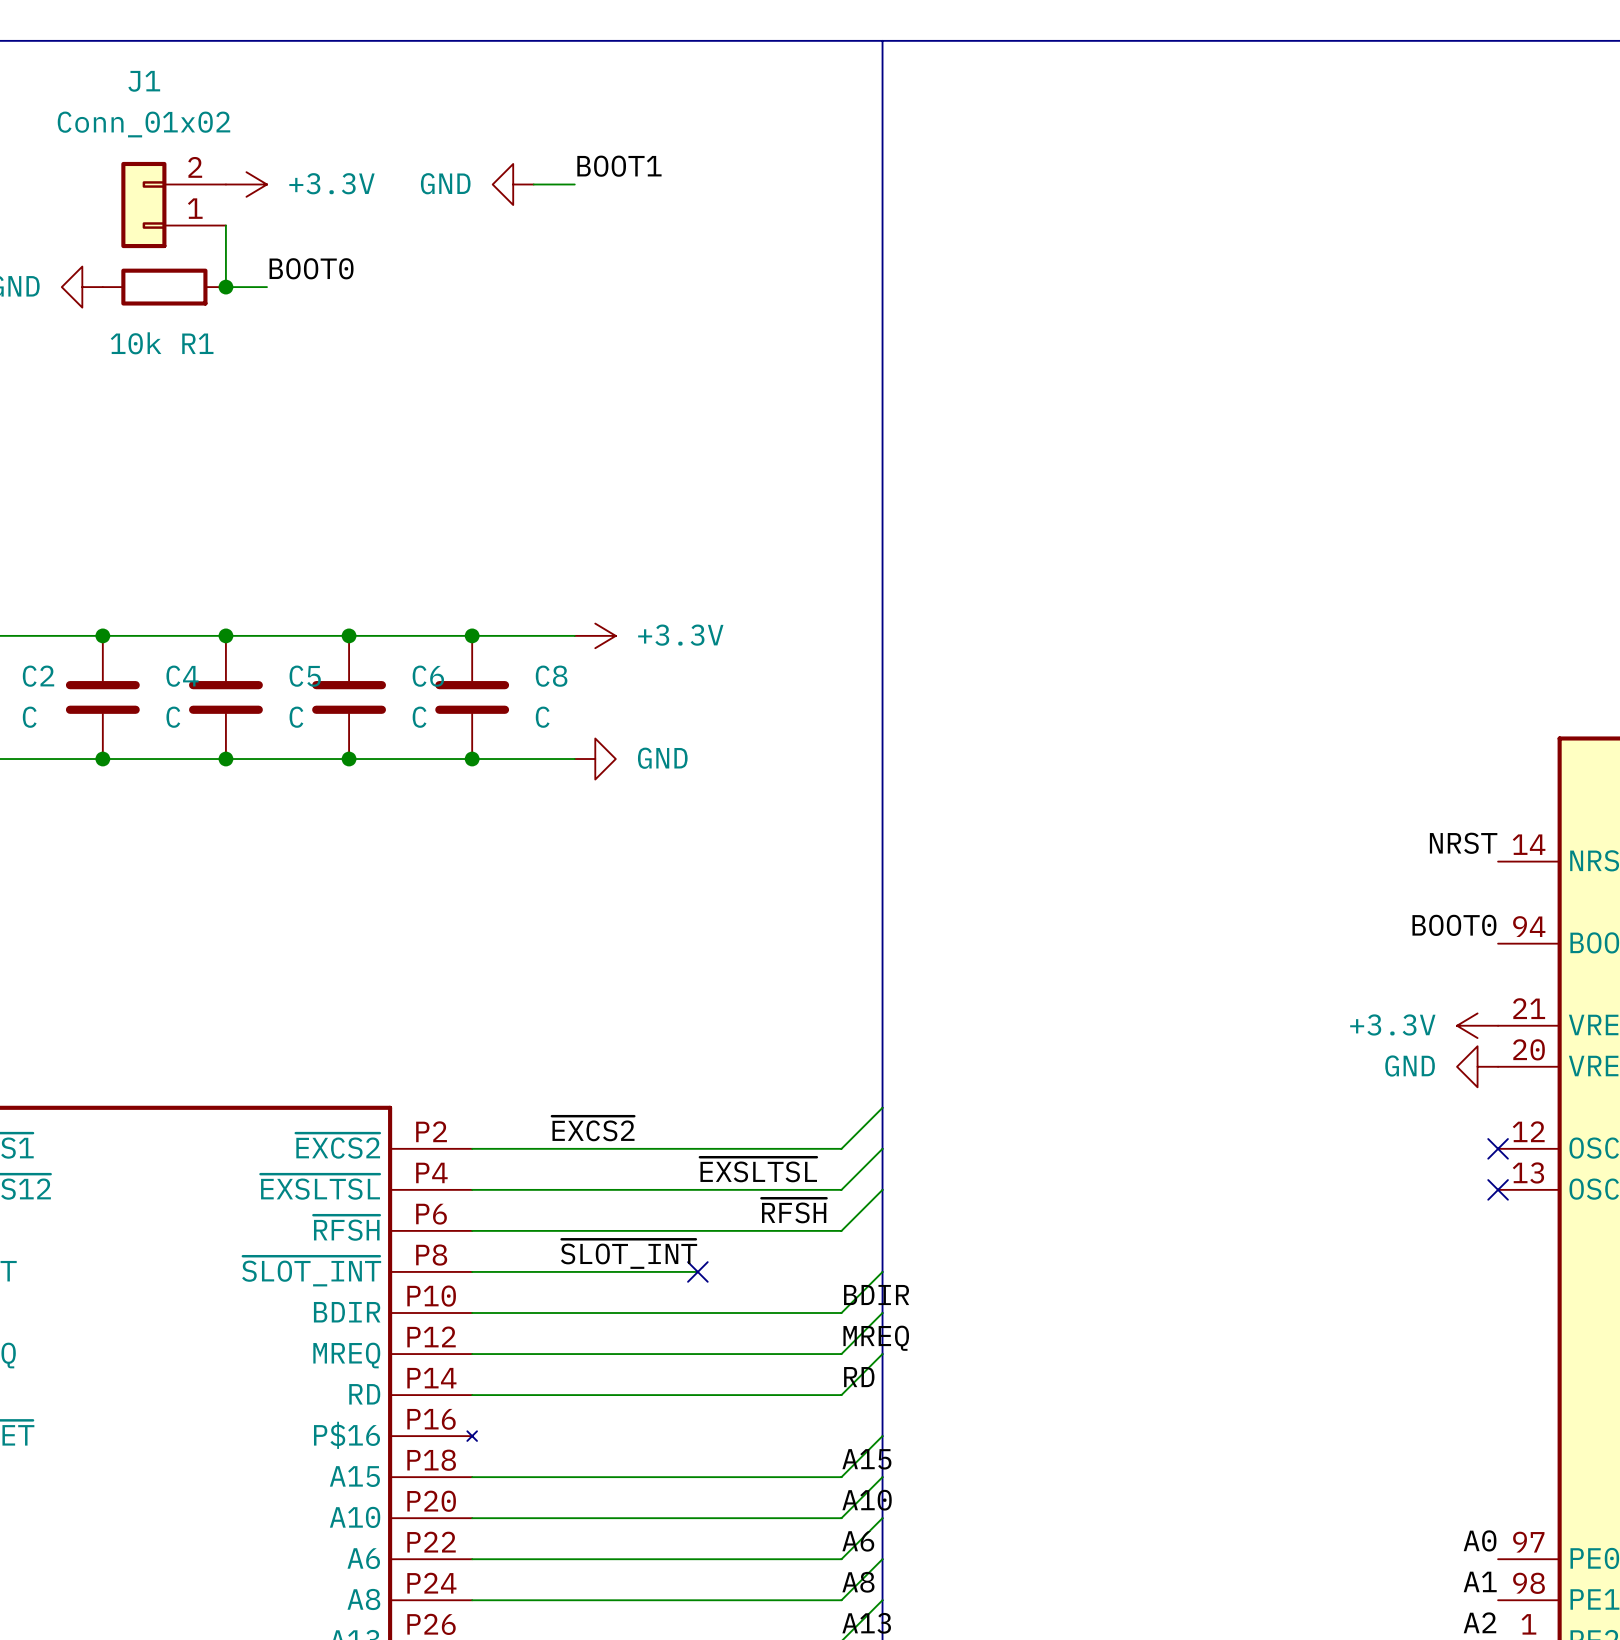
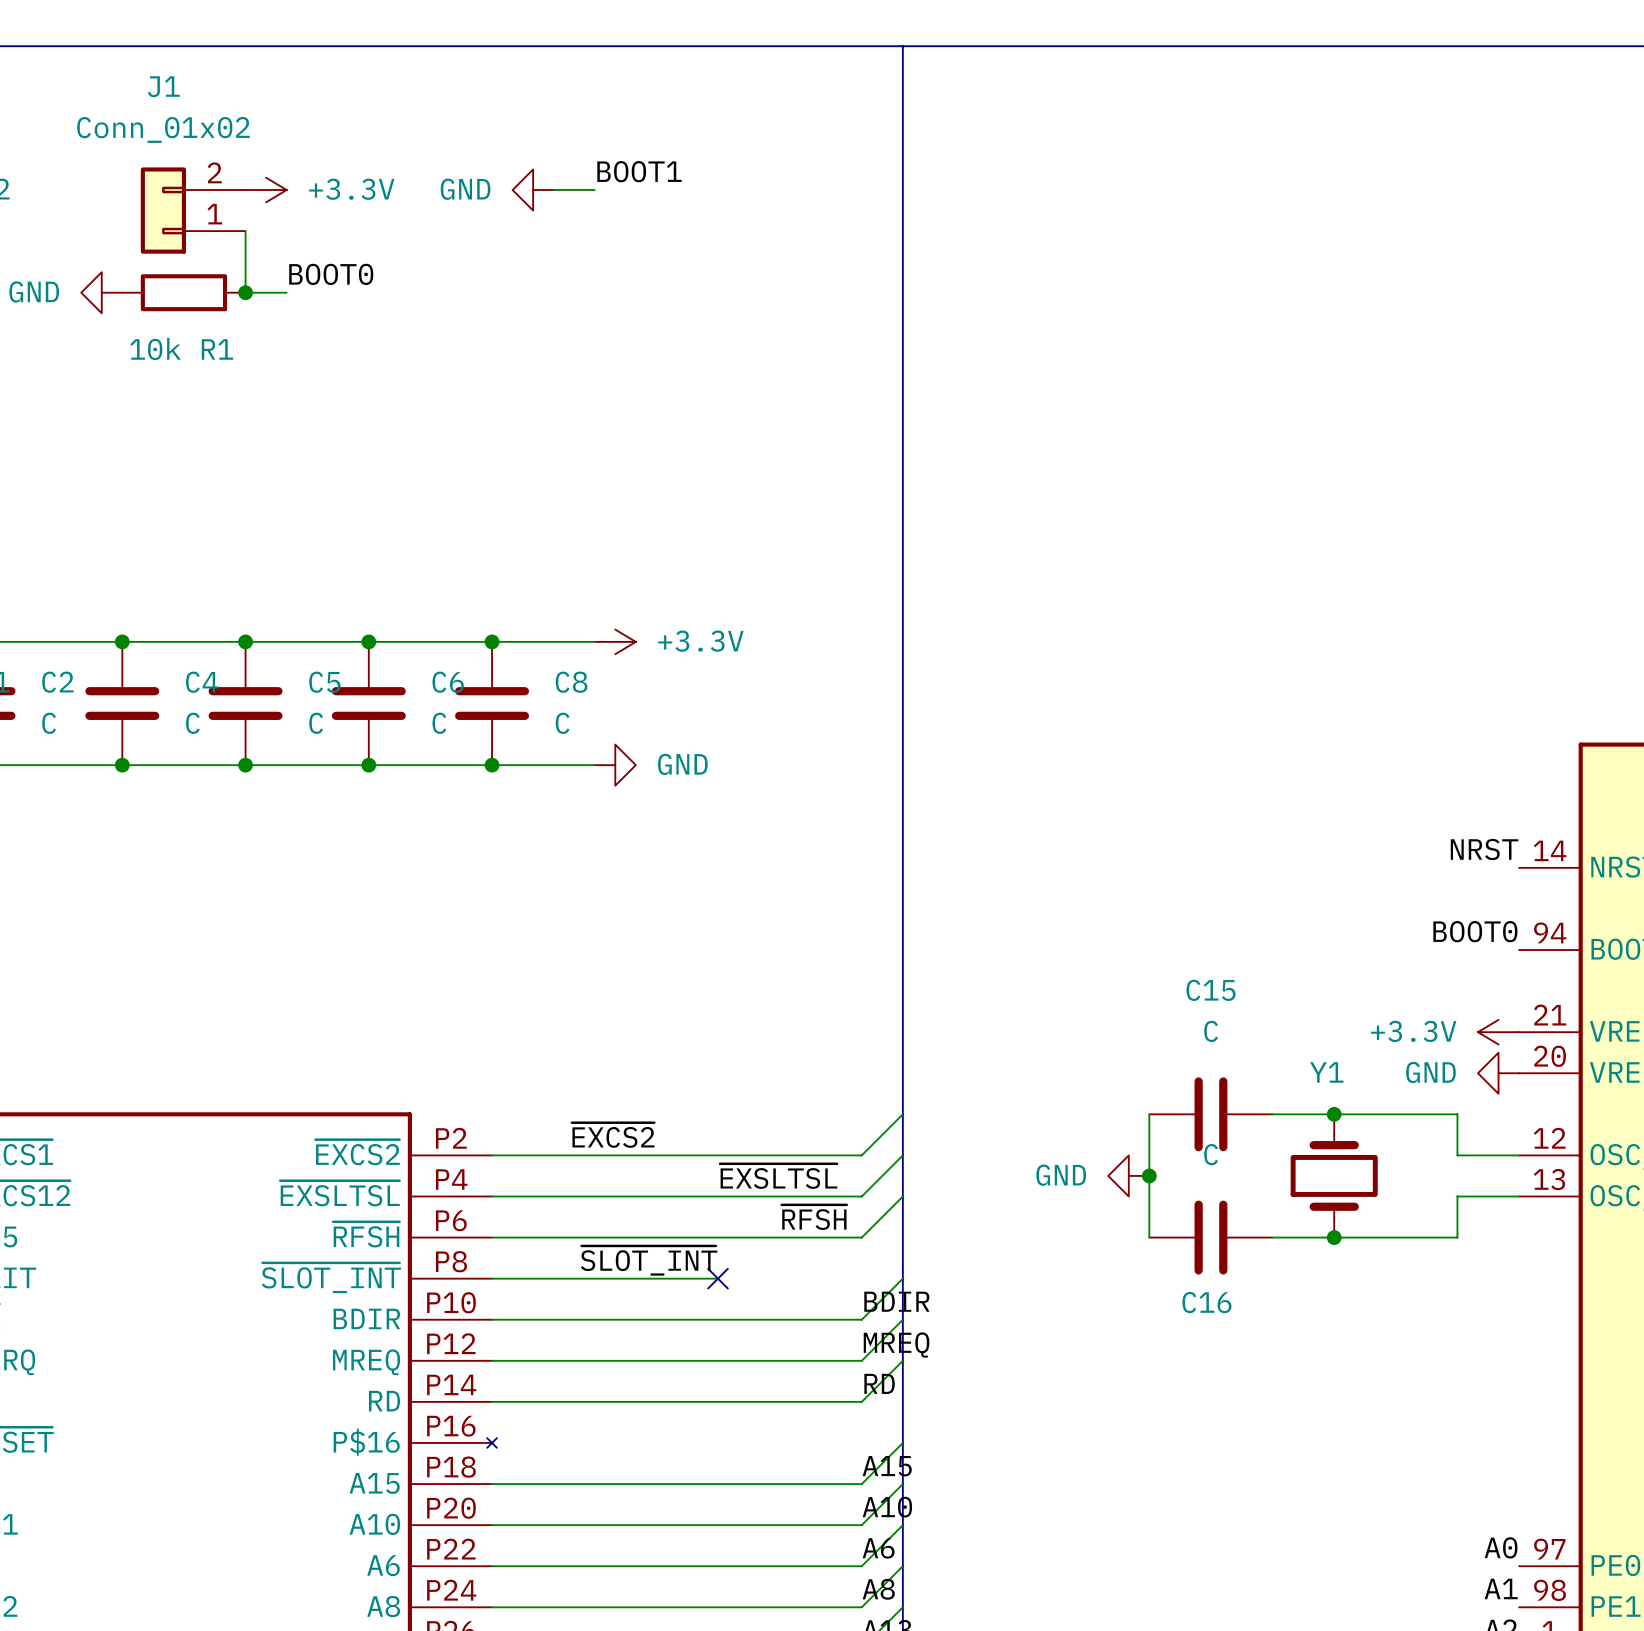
wire: none -> (1149, 1114) (1149, 1237)
C15: none -> C (1210, 1114)
wire: none -> (1272, 1114) (1457, 1114) (1457, 1155) (1519, 1155)
junction: none -> (1334, 1114)
no-connect mark: (1498, 1148) -> none
power symbol: none -> GND (1128, 1175)
junction: none -> (1149, 1175)
Y1: none -> (1334, 1175)
wire: none -> (1519, 1196) (1457, 1196) (1457, 1237) (1272, 1237)
no-connect mark: (1498, 1189) -> none
C16: none -> C (1210, 1237)
junction: none -> (1334, 1237)

